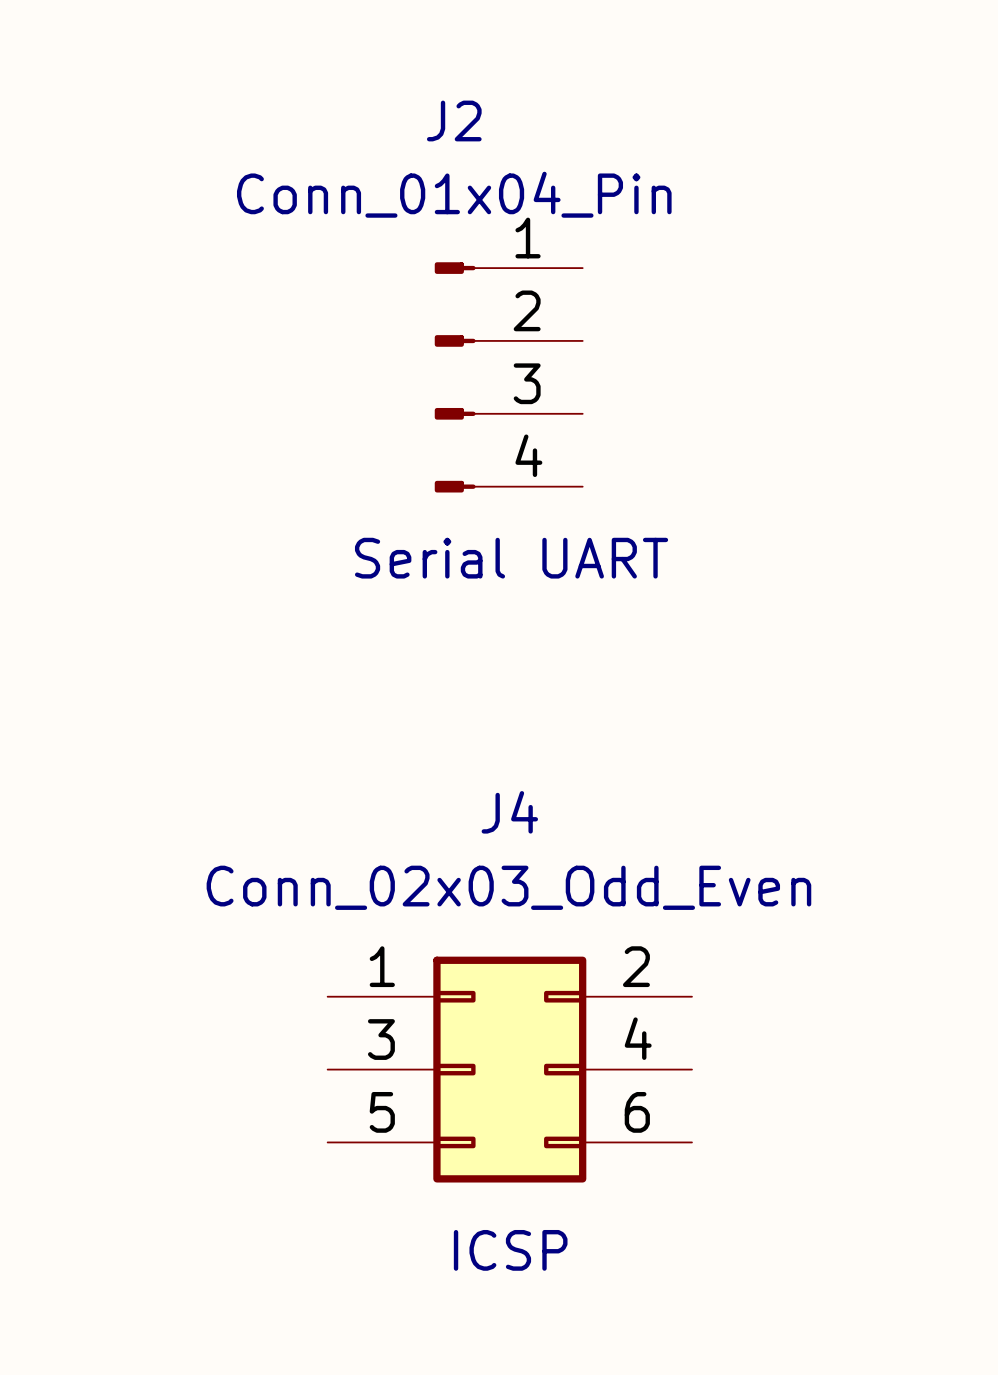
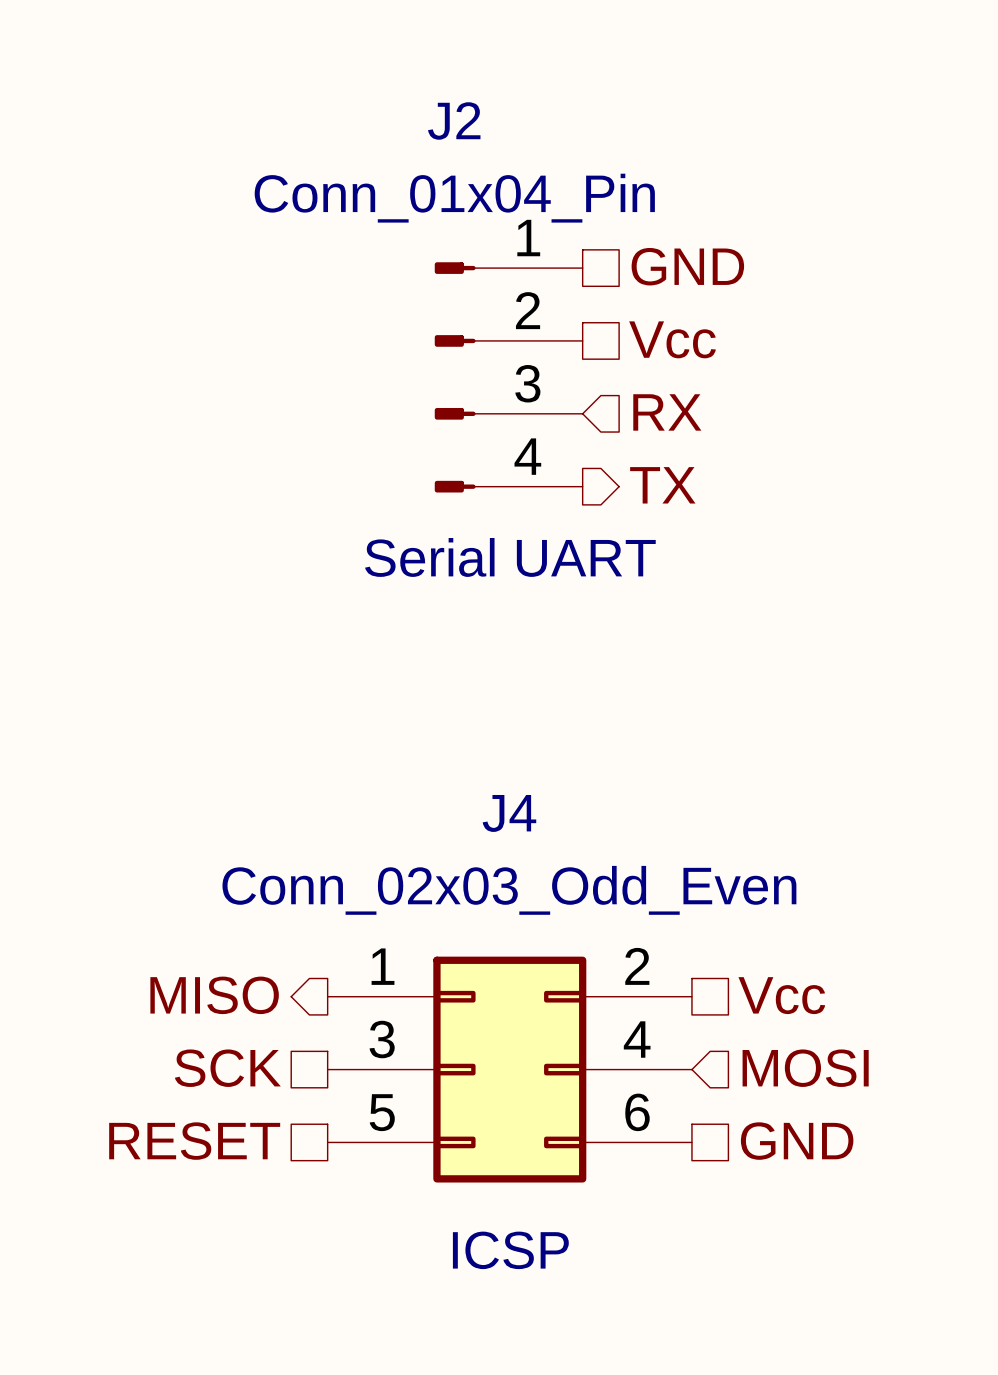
hierarchical label: none -> GND (687, 266)
hierarchical label: none -> Vcc (672, 339)
hierarchical label: none -> RX (667, 412)
hierarchical label: none -> TX (662, 485)
hierarchical label: none -> MISO (214, 995)
hierarchical label: none -> Vcc (781, 995)
hierarchical label: none -> SCK (227, 1068)
hierarchical label: none -> MOSI (805, 1068)
hierarchical label: none -> RESET (194, 1141)
hierarchical label: none -> GND (797, 1141)

